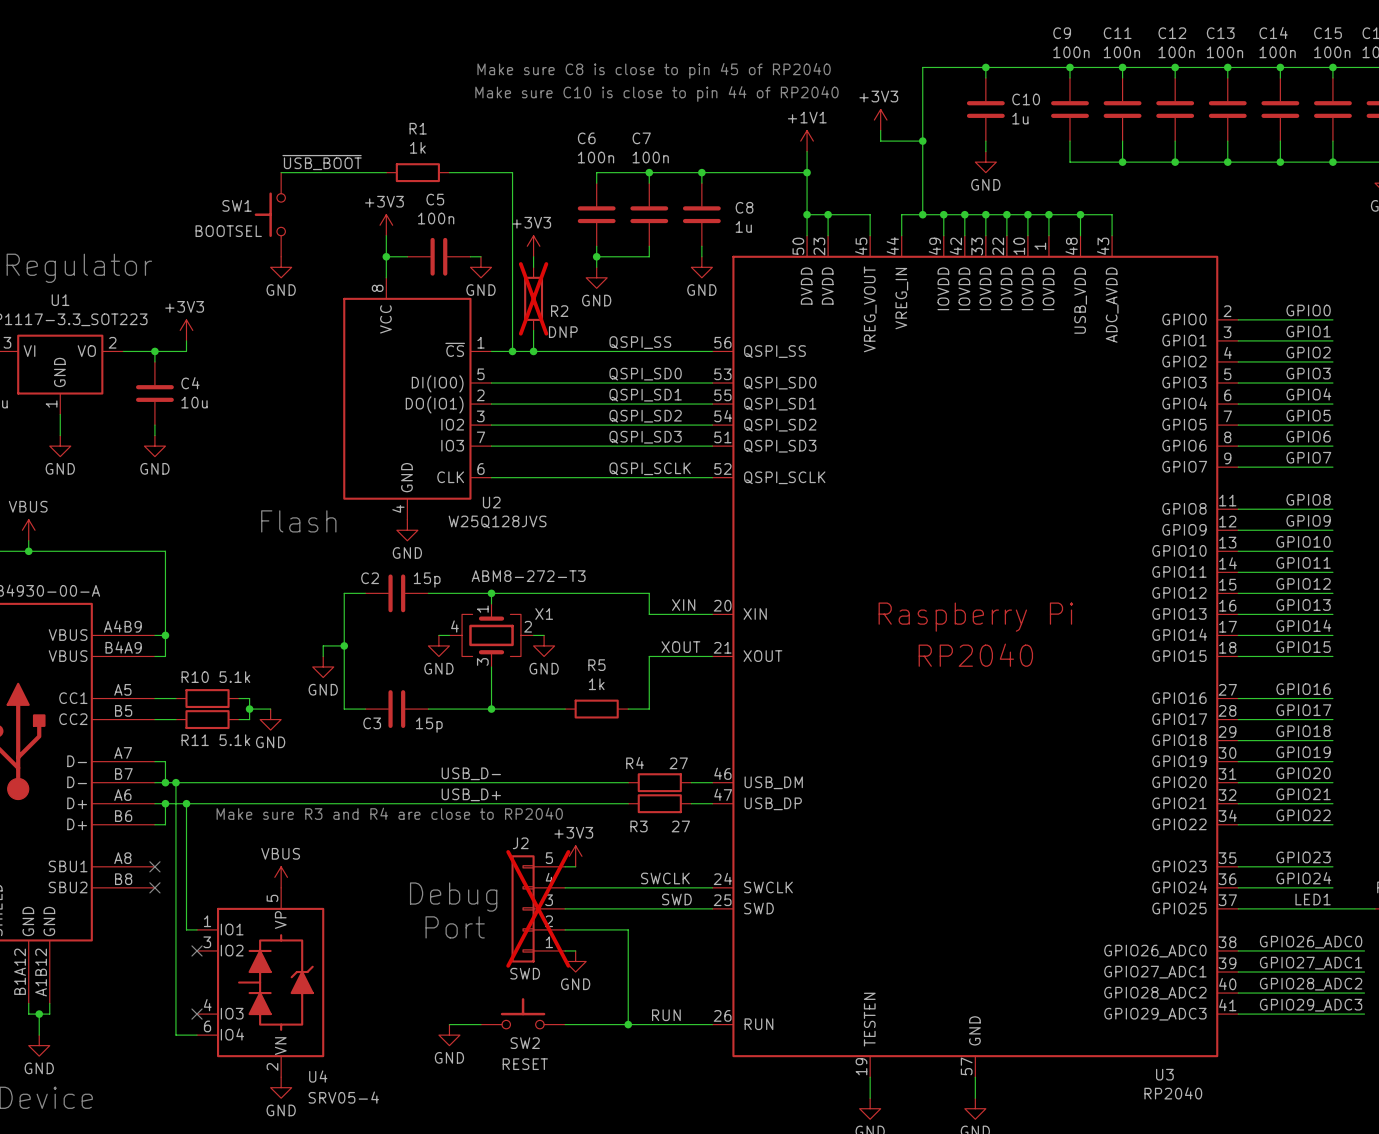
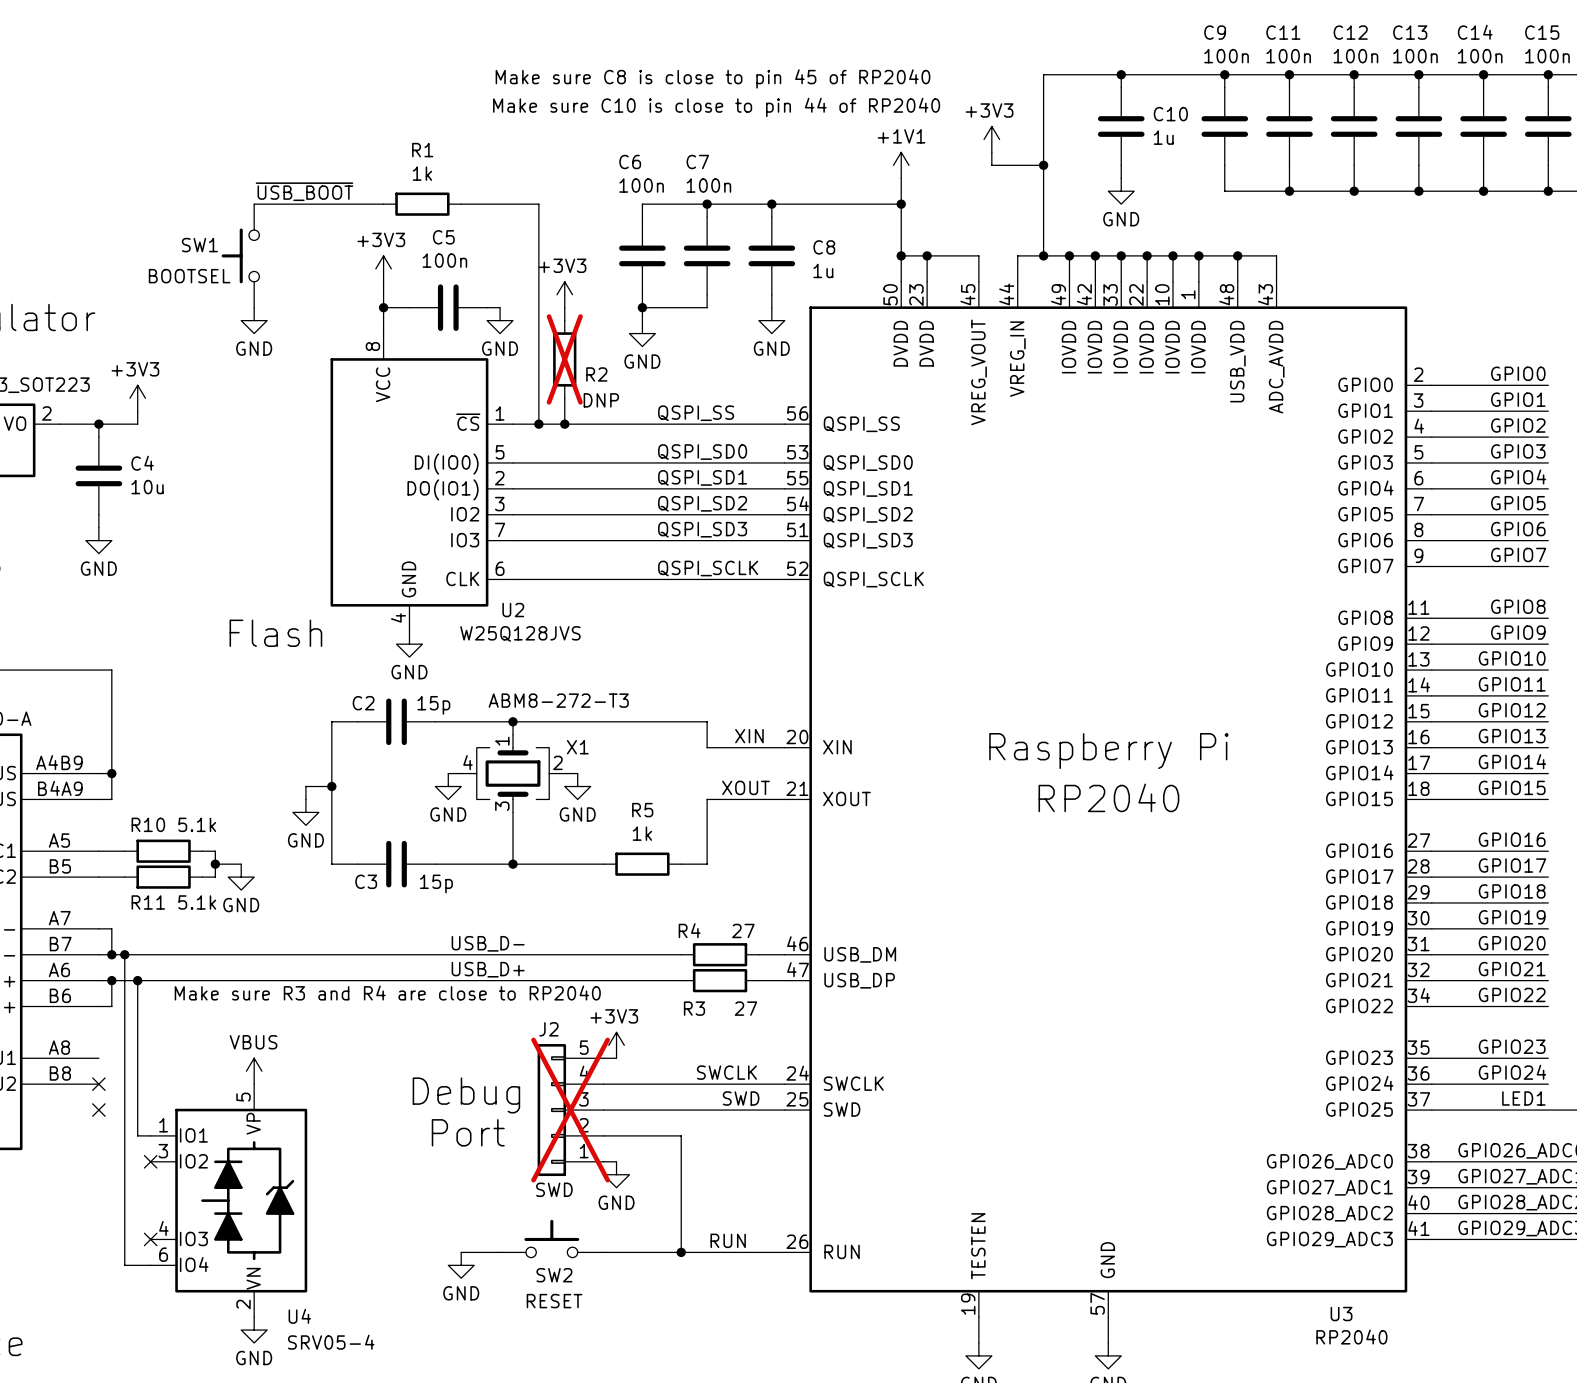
no-connect mark position: (154, 866) -> (98, 1110)

